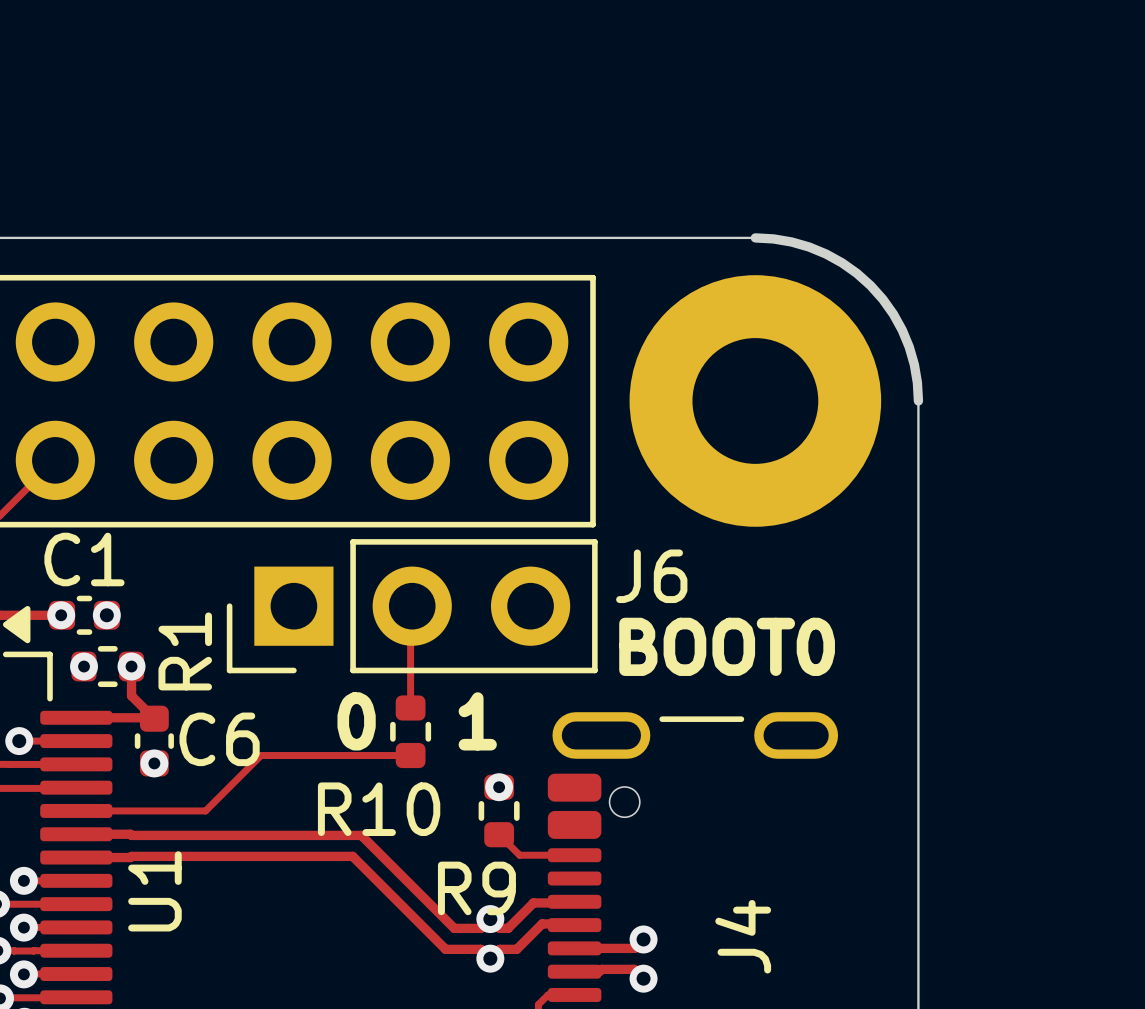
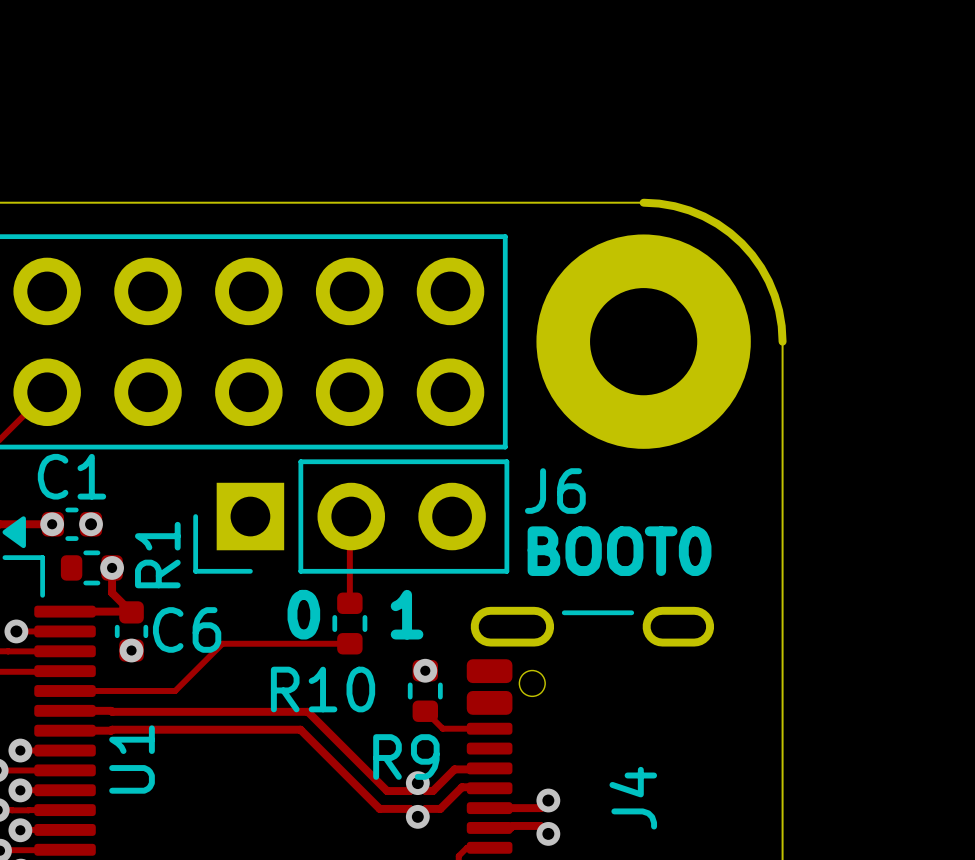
via: (84, 666) -> none

